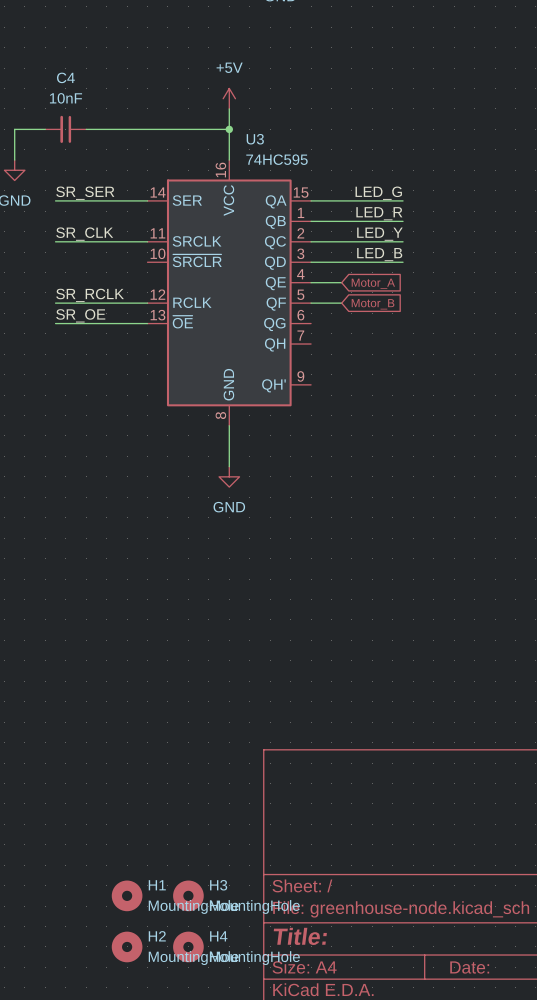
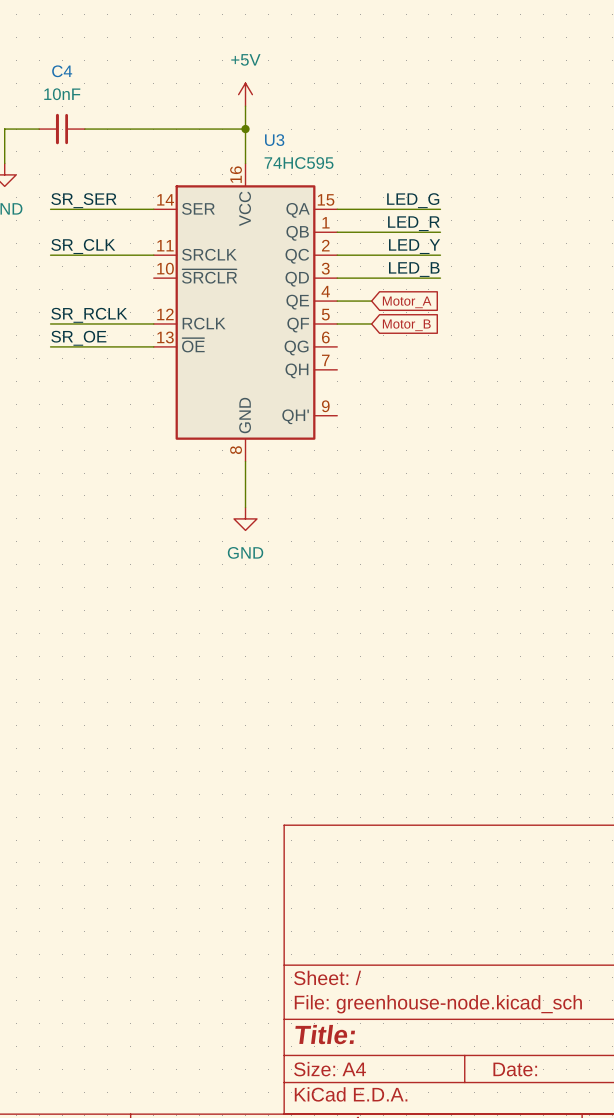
H1: MountingHole (127, 895) -> none
H3: MountingHole (188, 895) -> none
H2: MountingHole (127, 946) -> none
H4: MountingHole (188, 946) -> none

